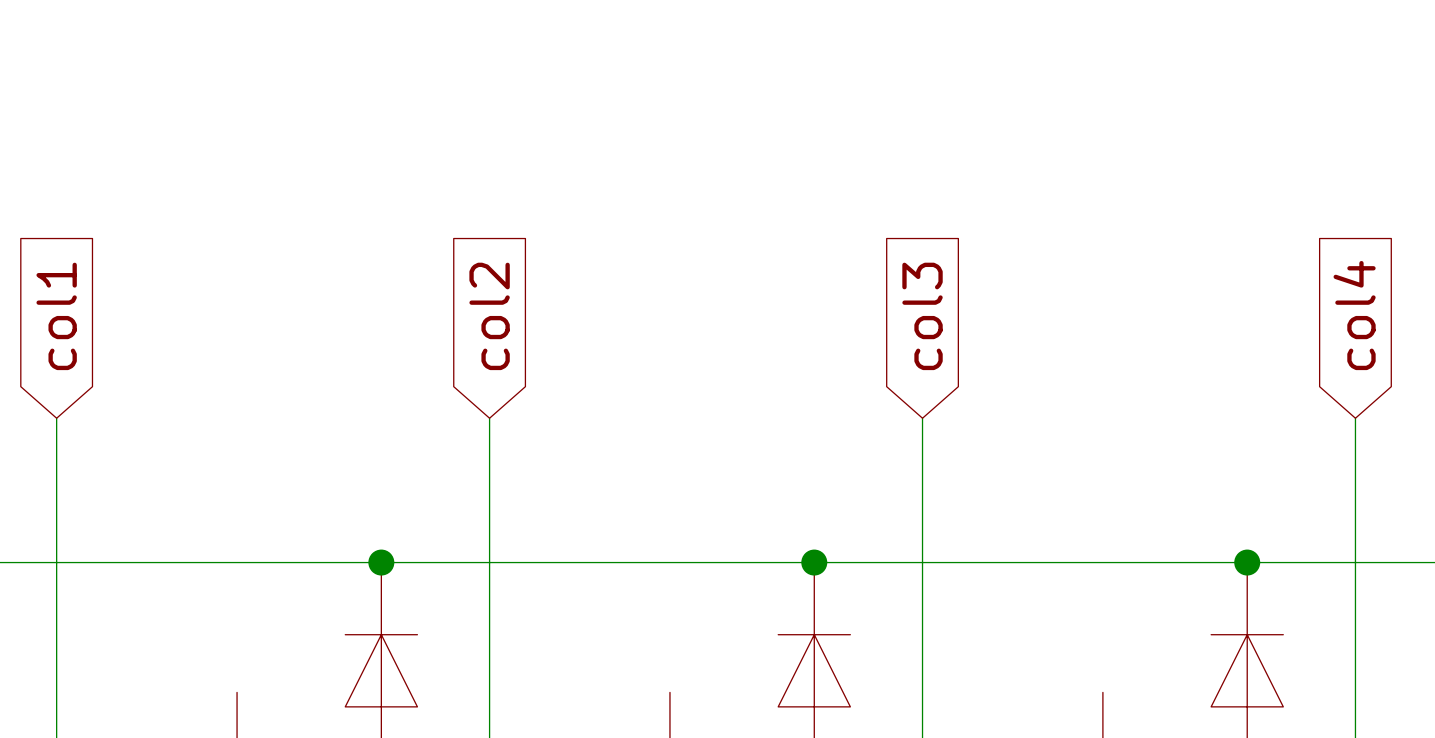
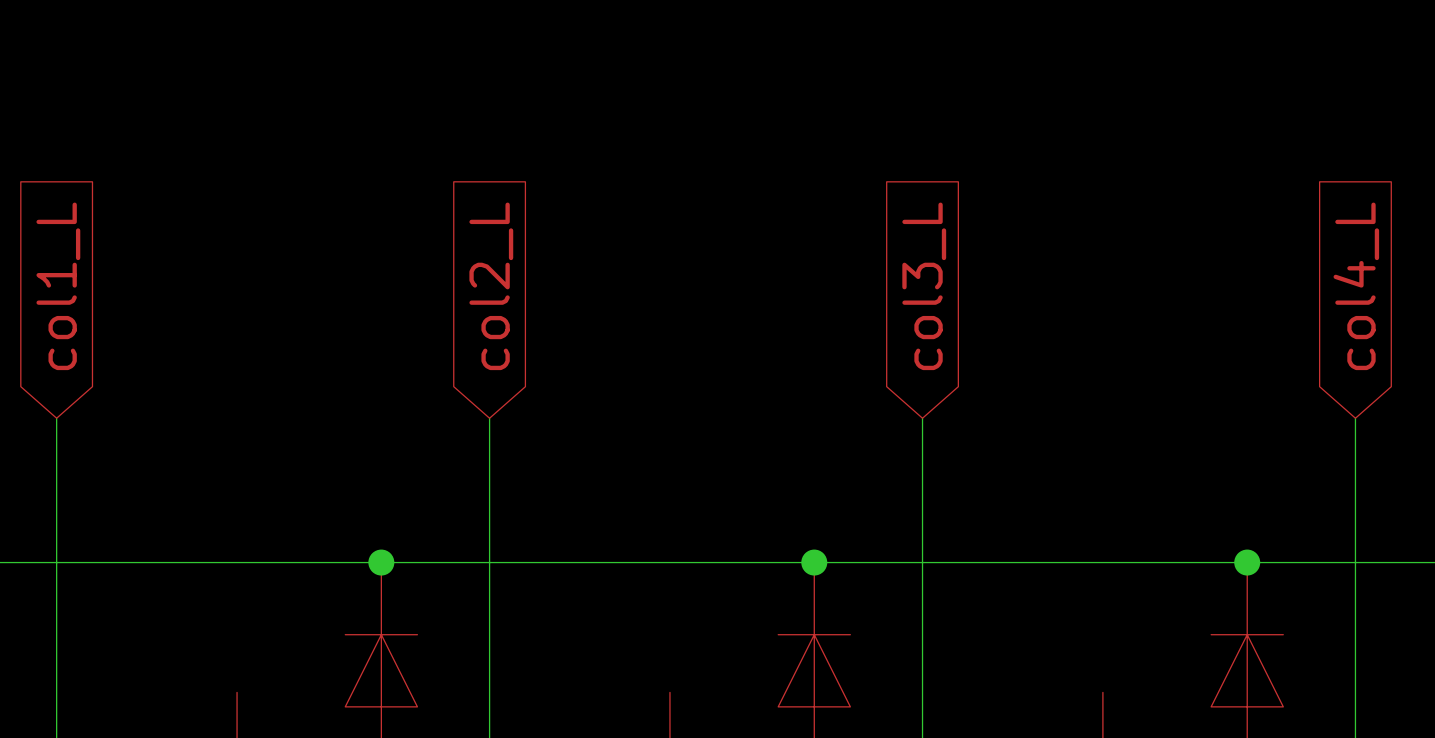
global label: col4 (1354, 315) -> col4_L (1356, 286)
global label: col1 (56, 316) -> col1_L (58, 286)
global label: col2 (489, 316) -> col2_L (491, 286)
global label: col3 (922, 316) -> col3_L (924, 286)

